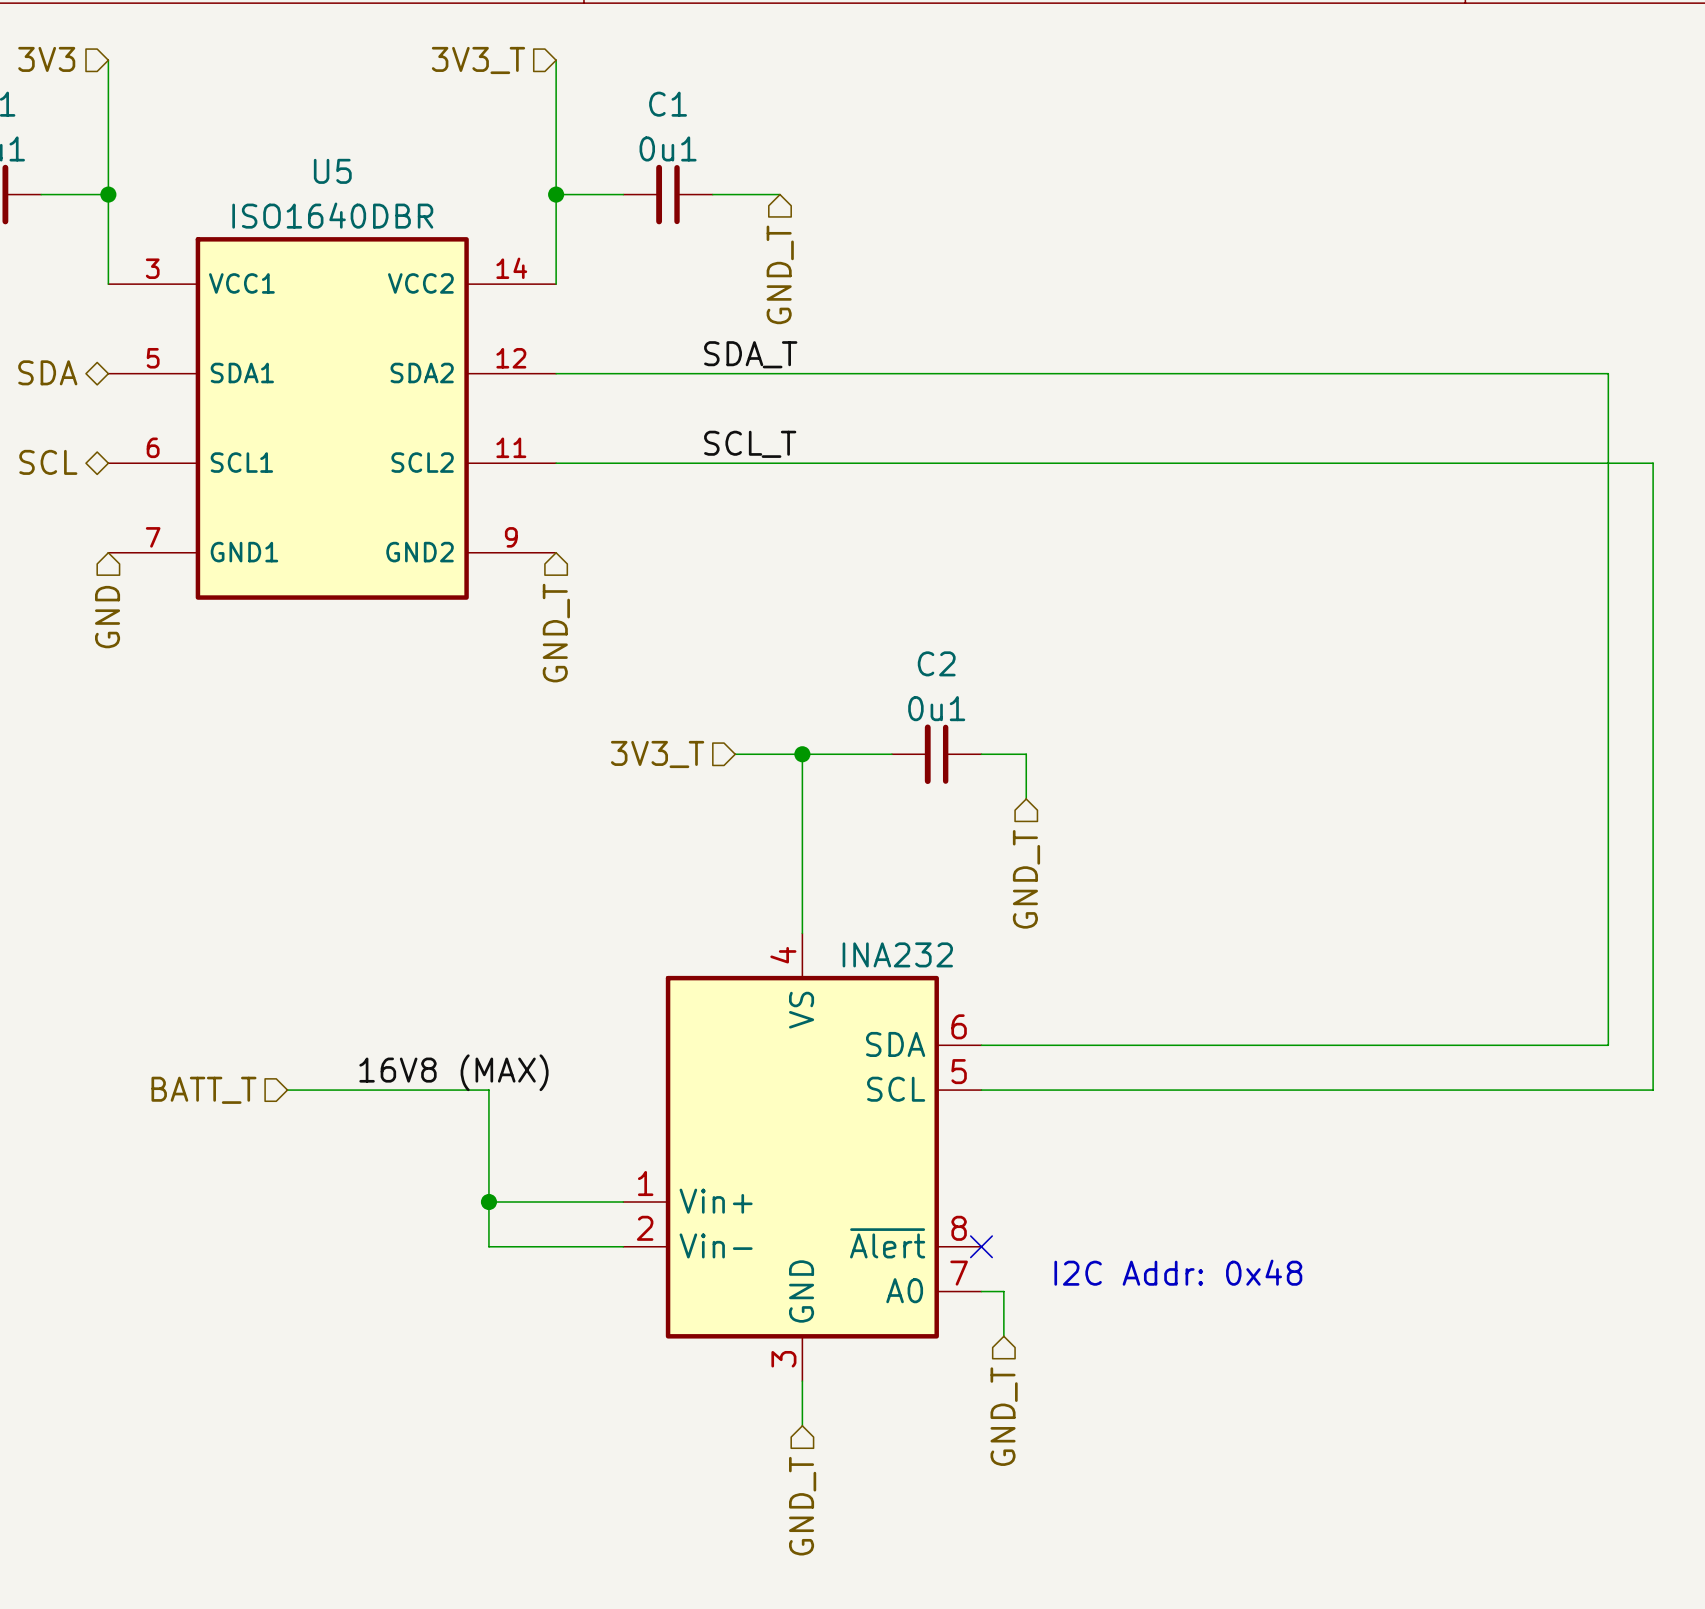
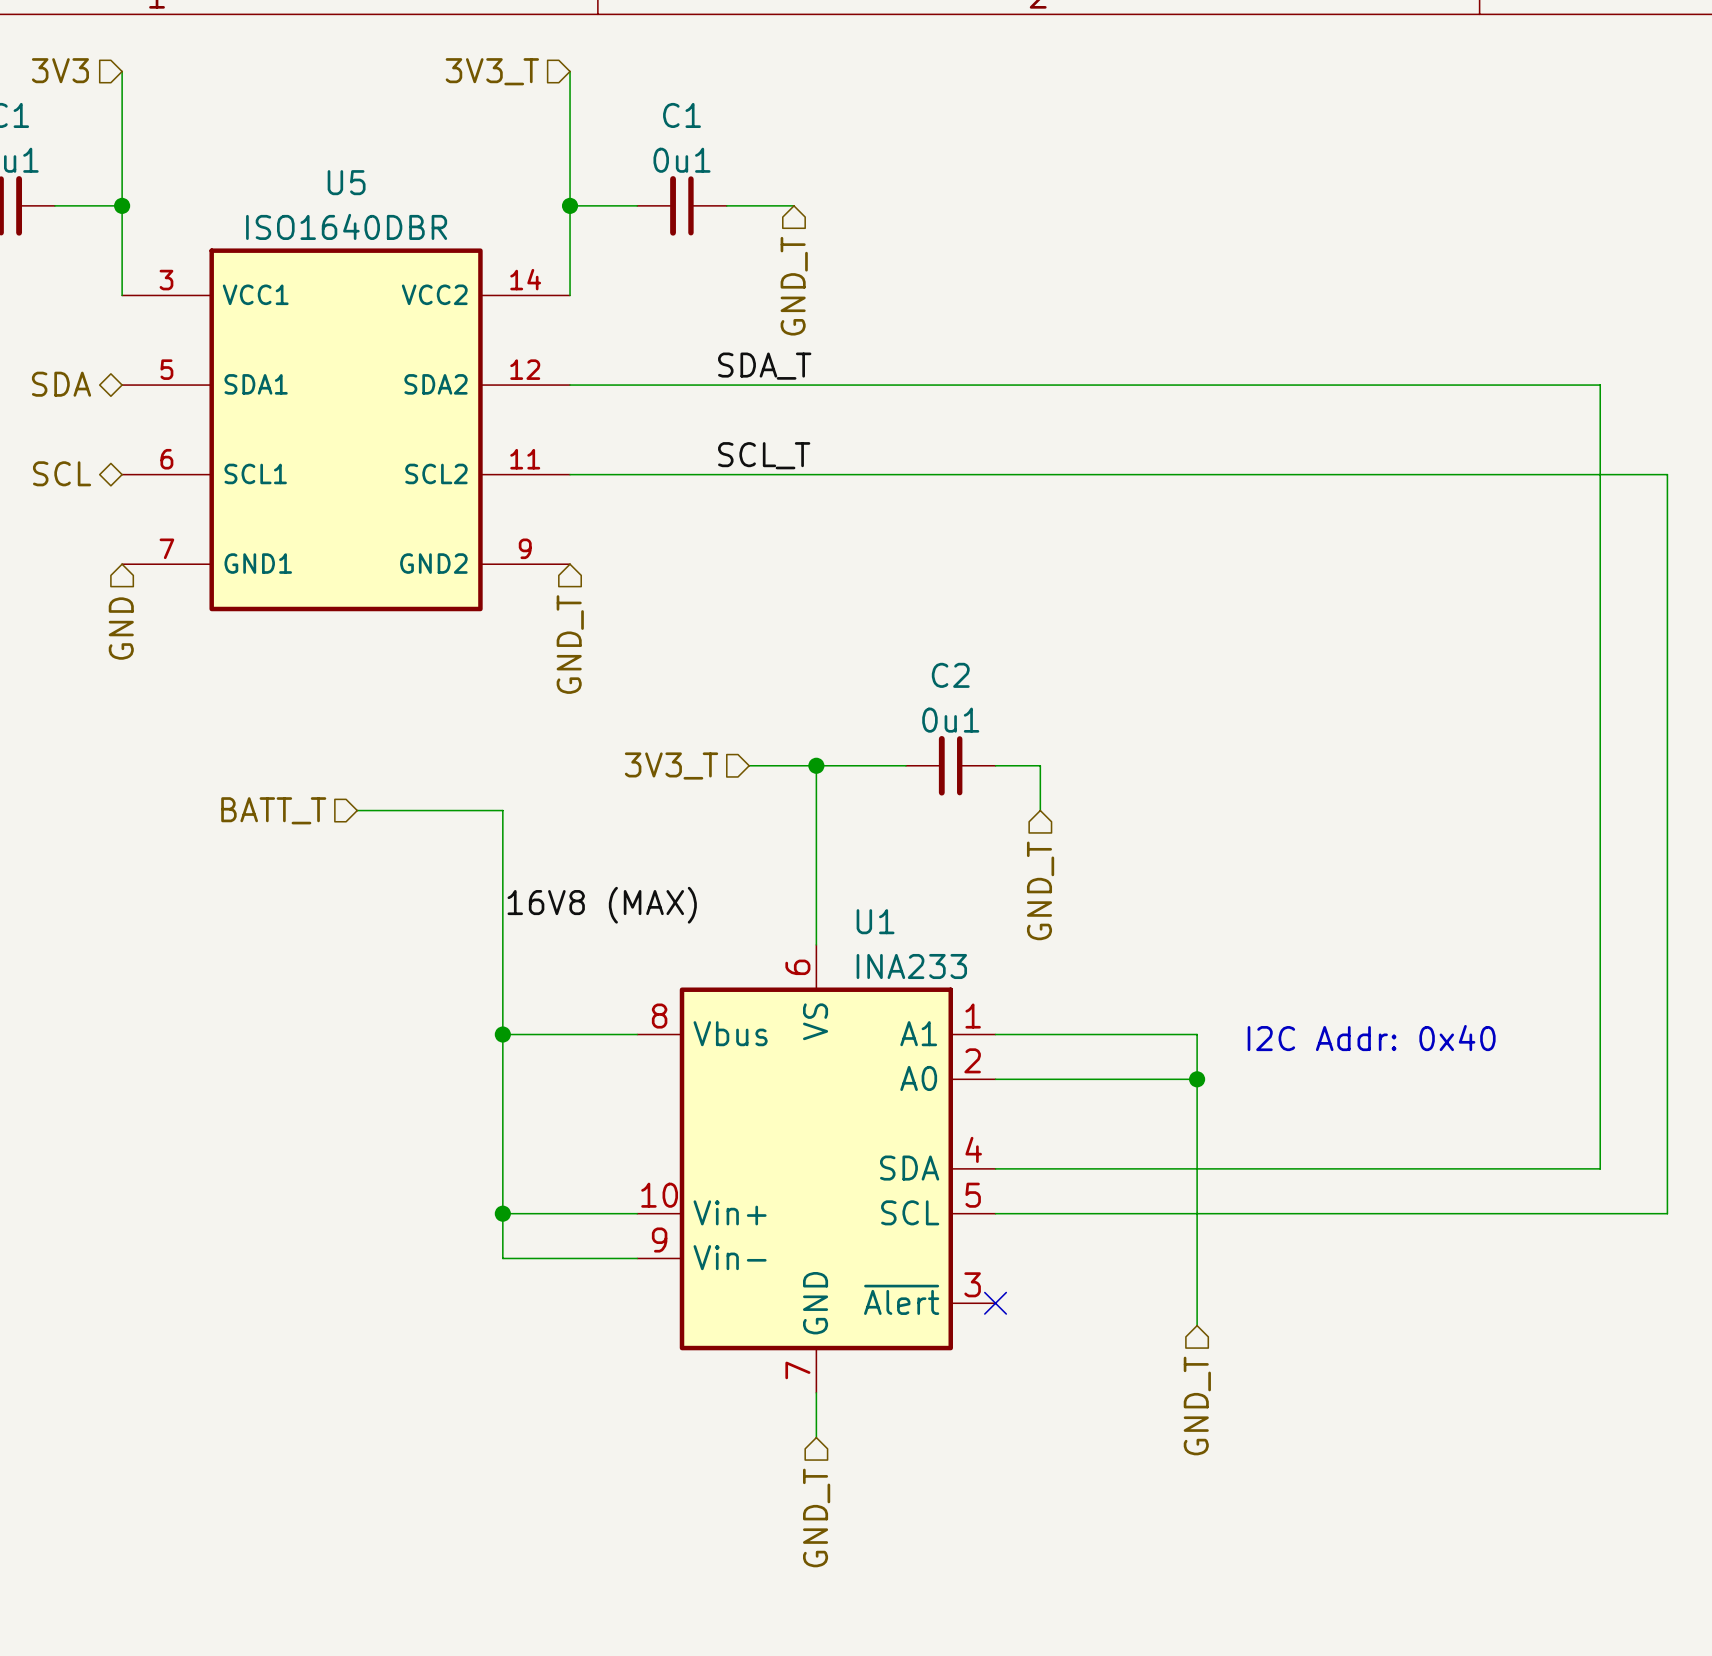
wire: (1585, 373) (1608, 373) (1608, 1045) (981, 1045) -> (1600, 385) (1600, 1168) (995, 1168)
wire: none -> (502, 1034) (637, 1034)
junction: none -> (502, 1034)
wire: none -> (995, 1034) (1197, 1034) (1197, 1325)
text: none -> I2C Addr: 0x40 (1371, 1038)
wire: none -> (995, 1079) (1197, 1079)
junction: none -> (1197, 1079)
label position: 16V8 (MAX) (453, 1072) -> 16V8 (MAX) (602, 905)
hierarchical label position: BATT_T (203, 1090) -> BATT_T (273, 810)
wire: (287, 1090) (488, 1090) -> (357, 810) (502, 810) (502, 1101)
wire: (981, 1090) (1653, 1090) -> (995, 1213) (1667, 1213) (1667, 1101)
INA232: (802, 1157) -> none
U1: none -> INA233 (816, 1168)
no-connect mark position: (981, 1246) -> (995, 1303)
text: I2C Addr: 0x48 (1178, 1272) -> none
wire: (981, 1291) (1003, 1291) (1003, 1336) -> none
hierarchical label position: GND_T (1004, 1416) -> GND_T (1197, 1405)

